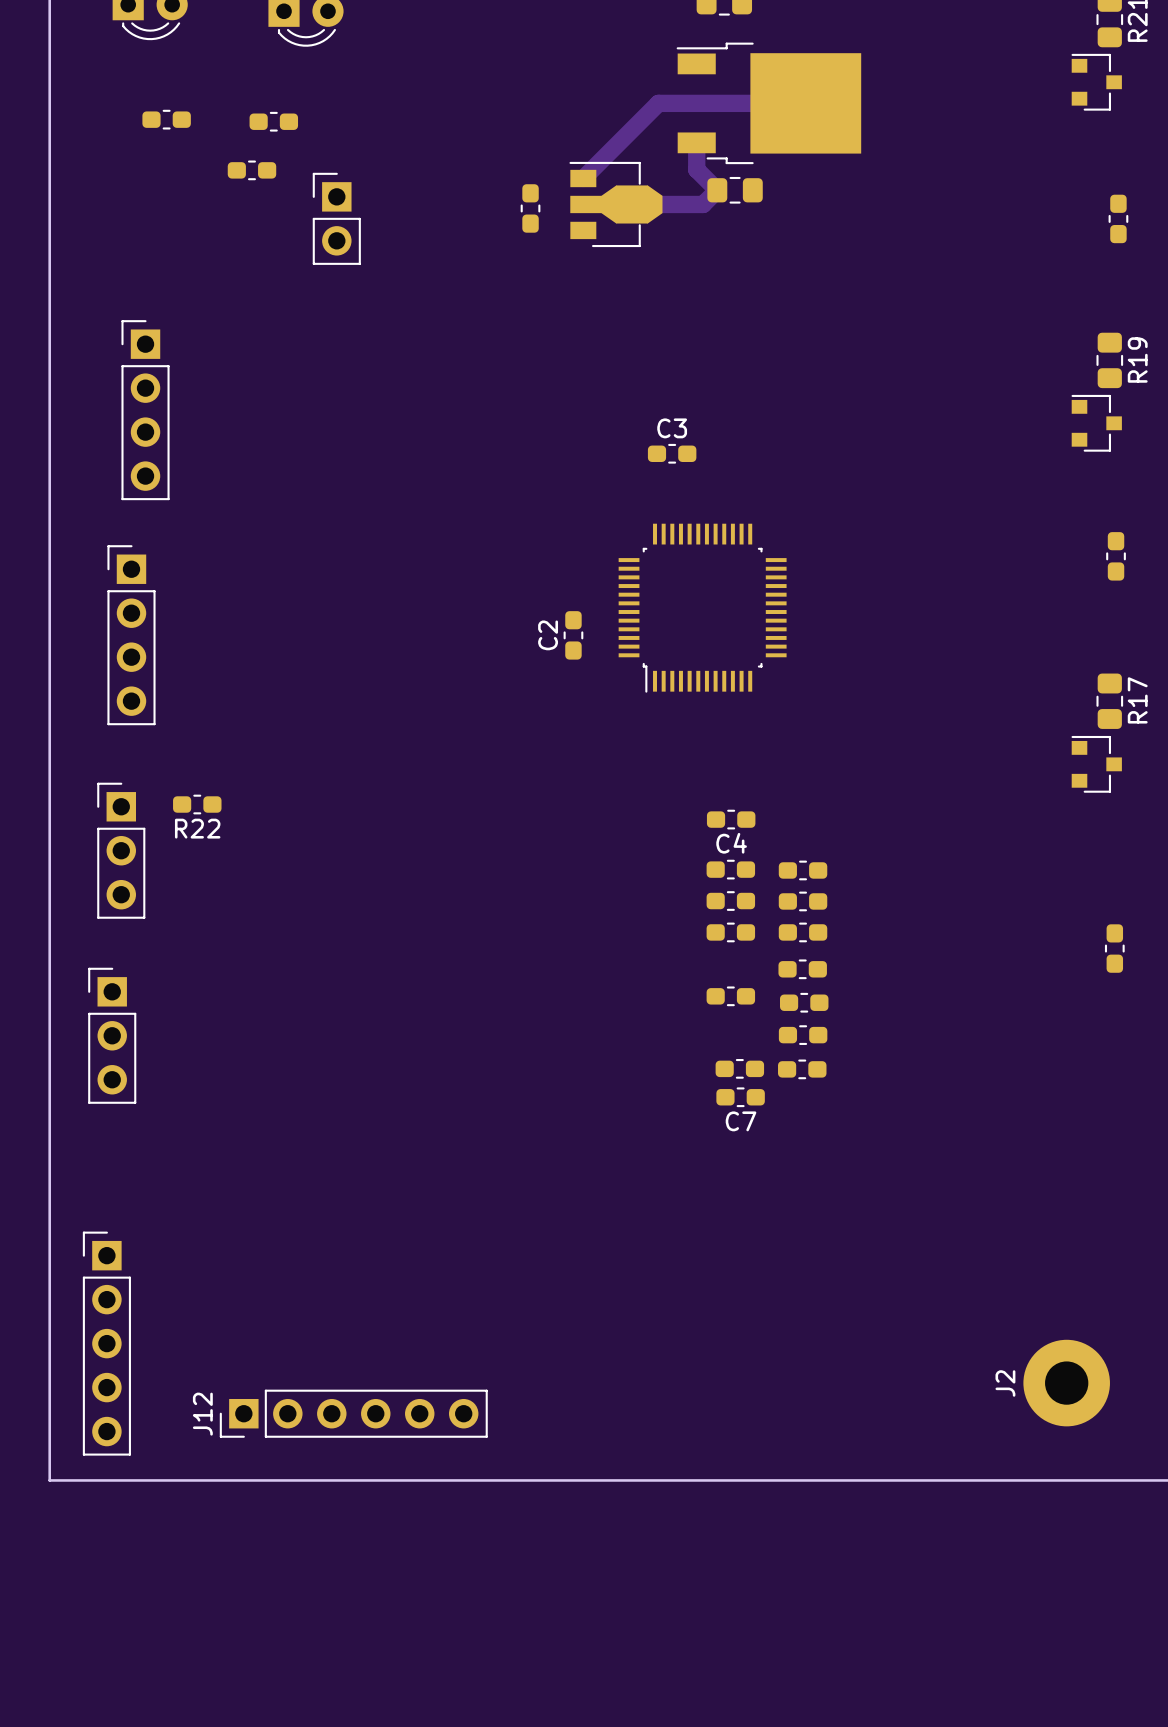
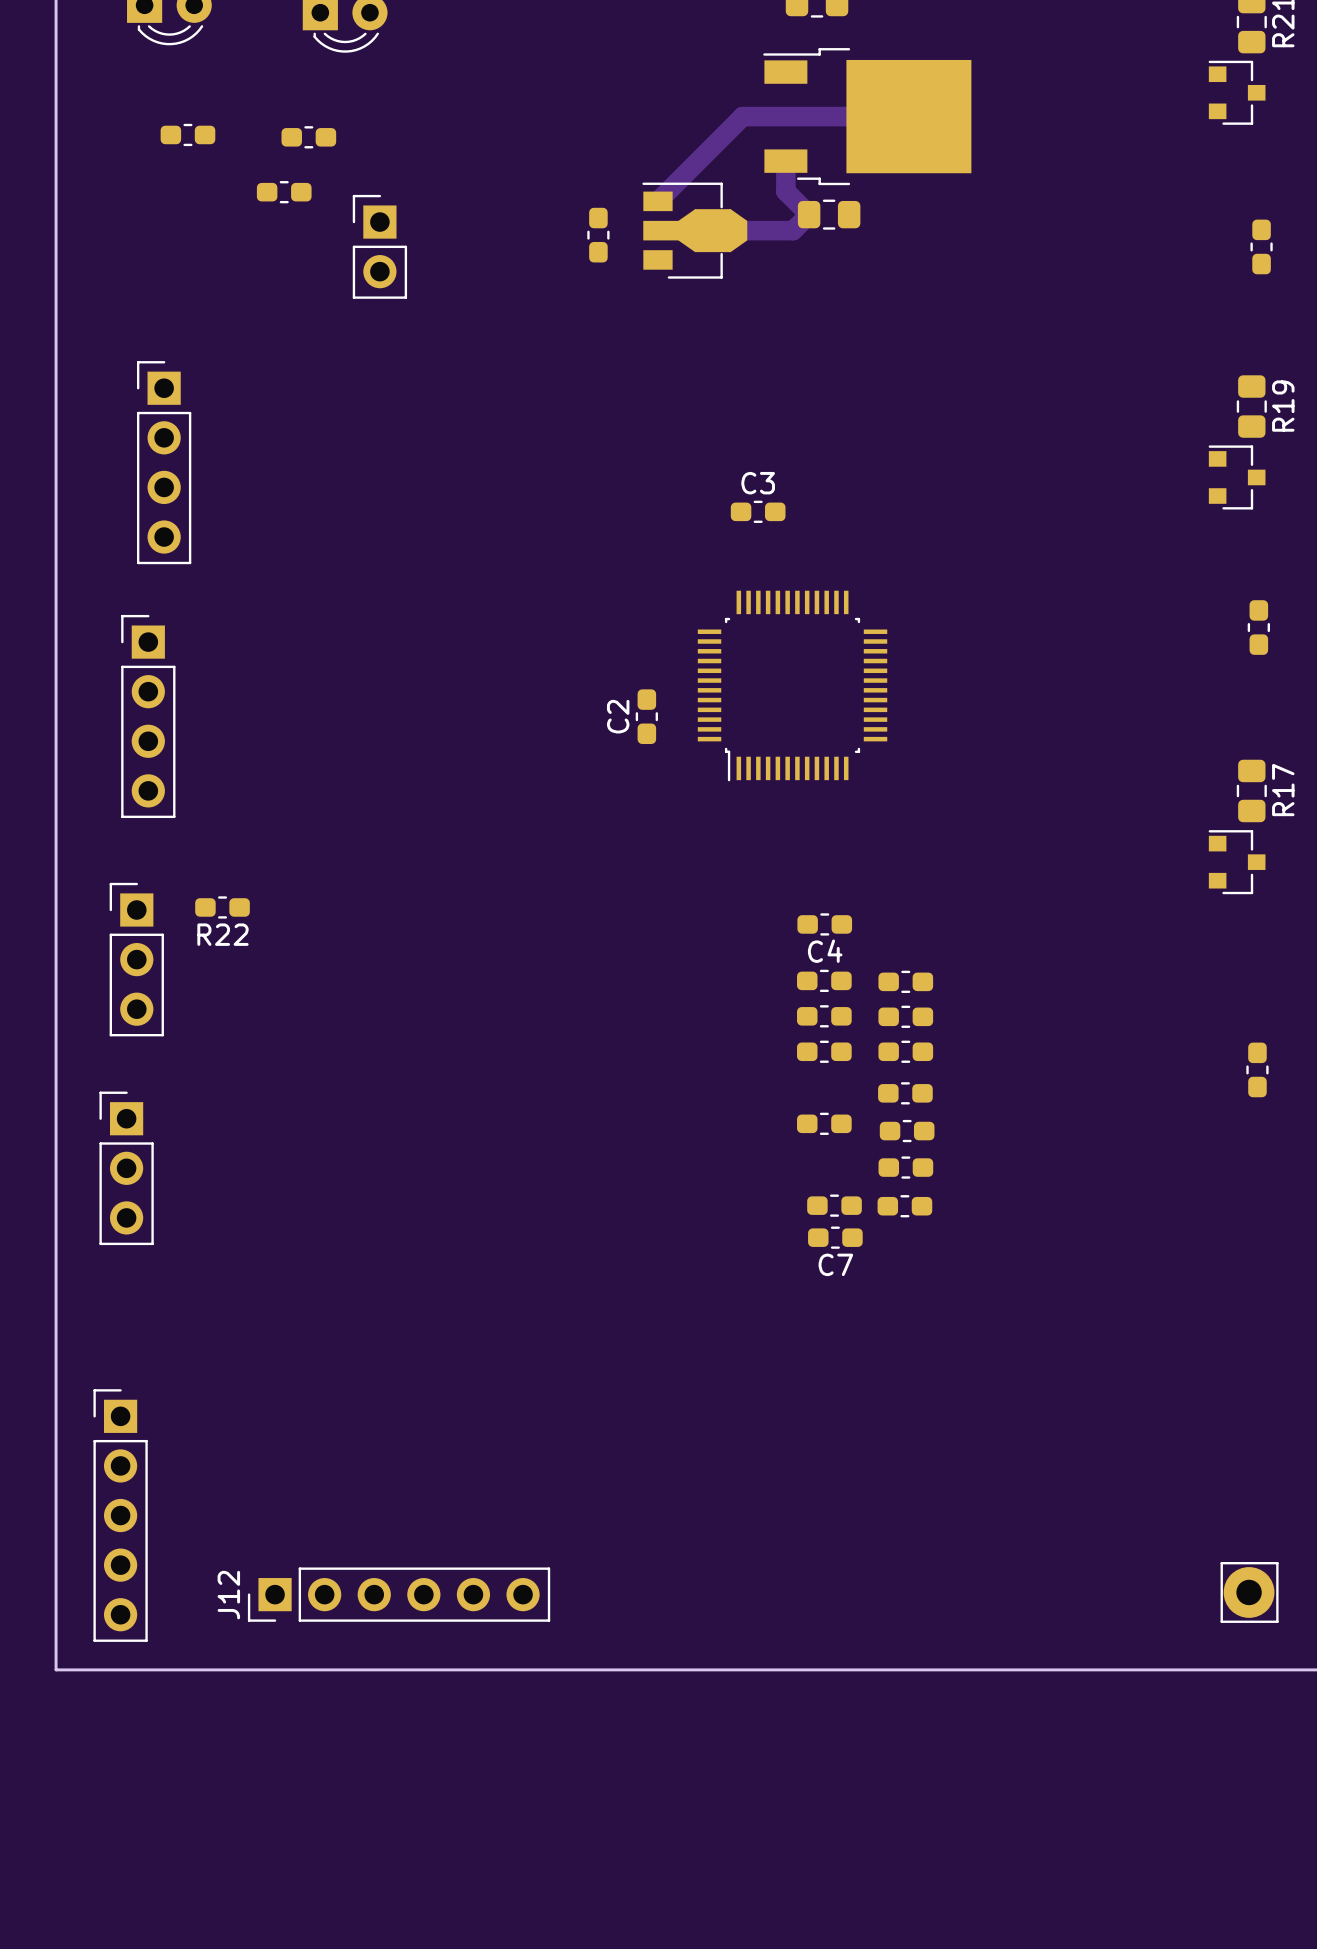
J2: (1066, 1383) -> none
part: none -> (1249, 1592)

